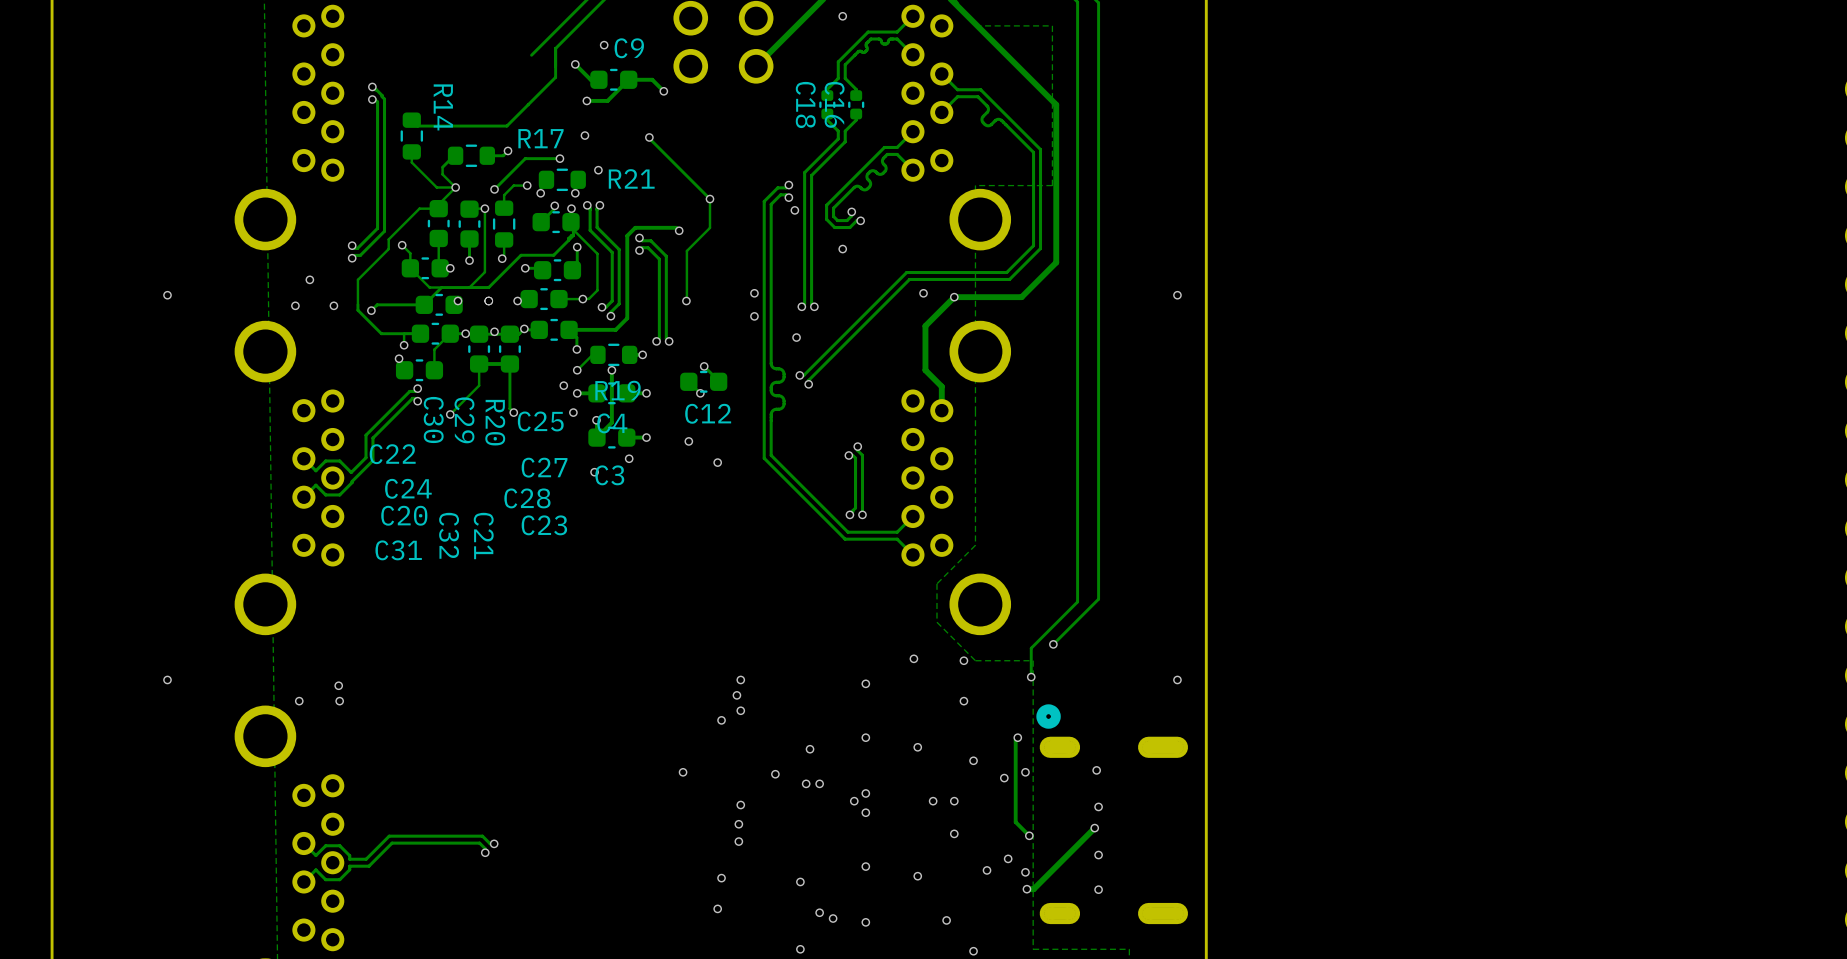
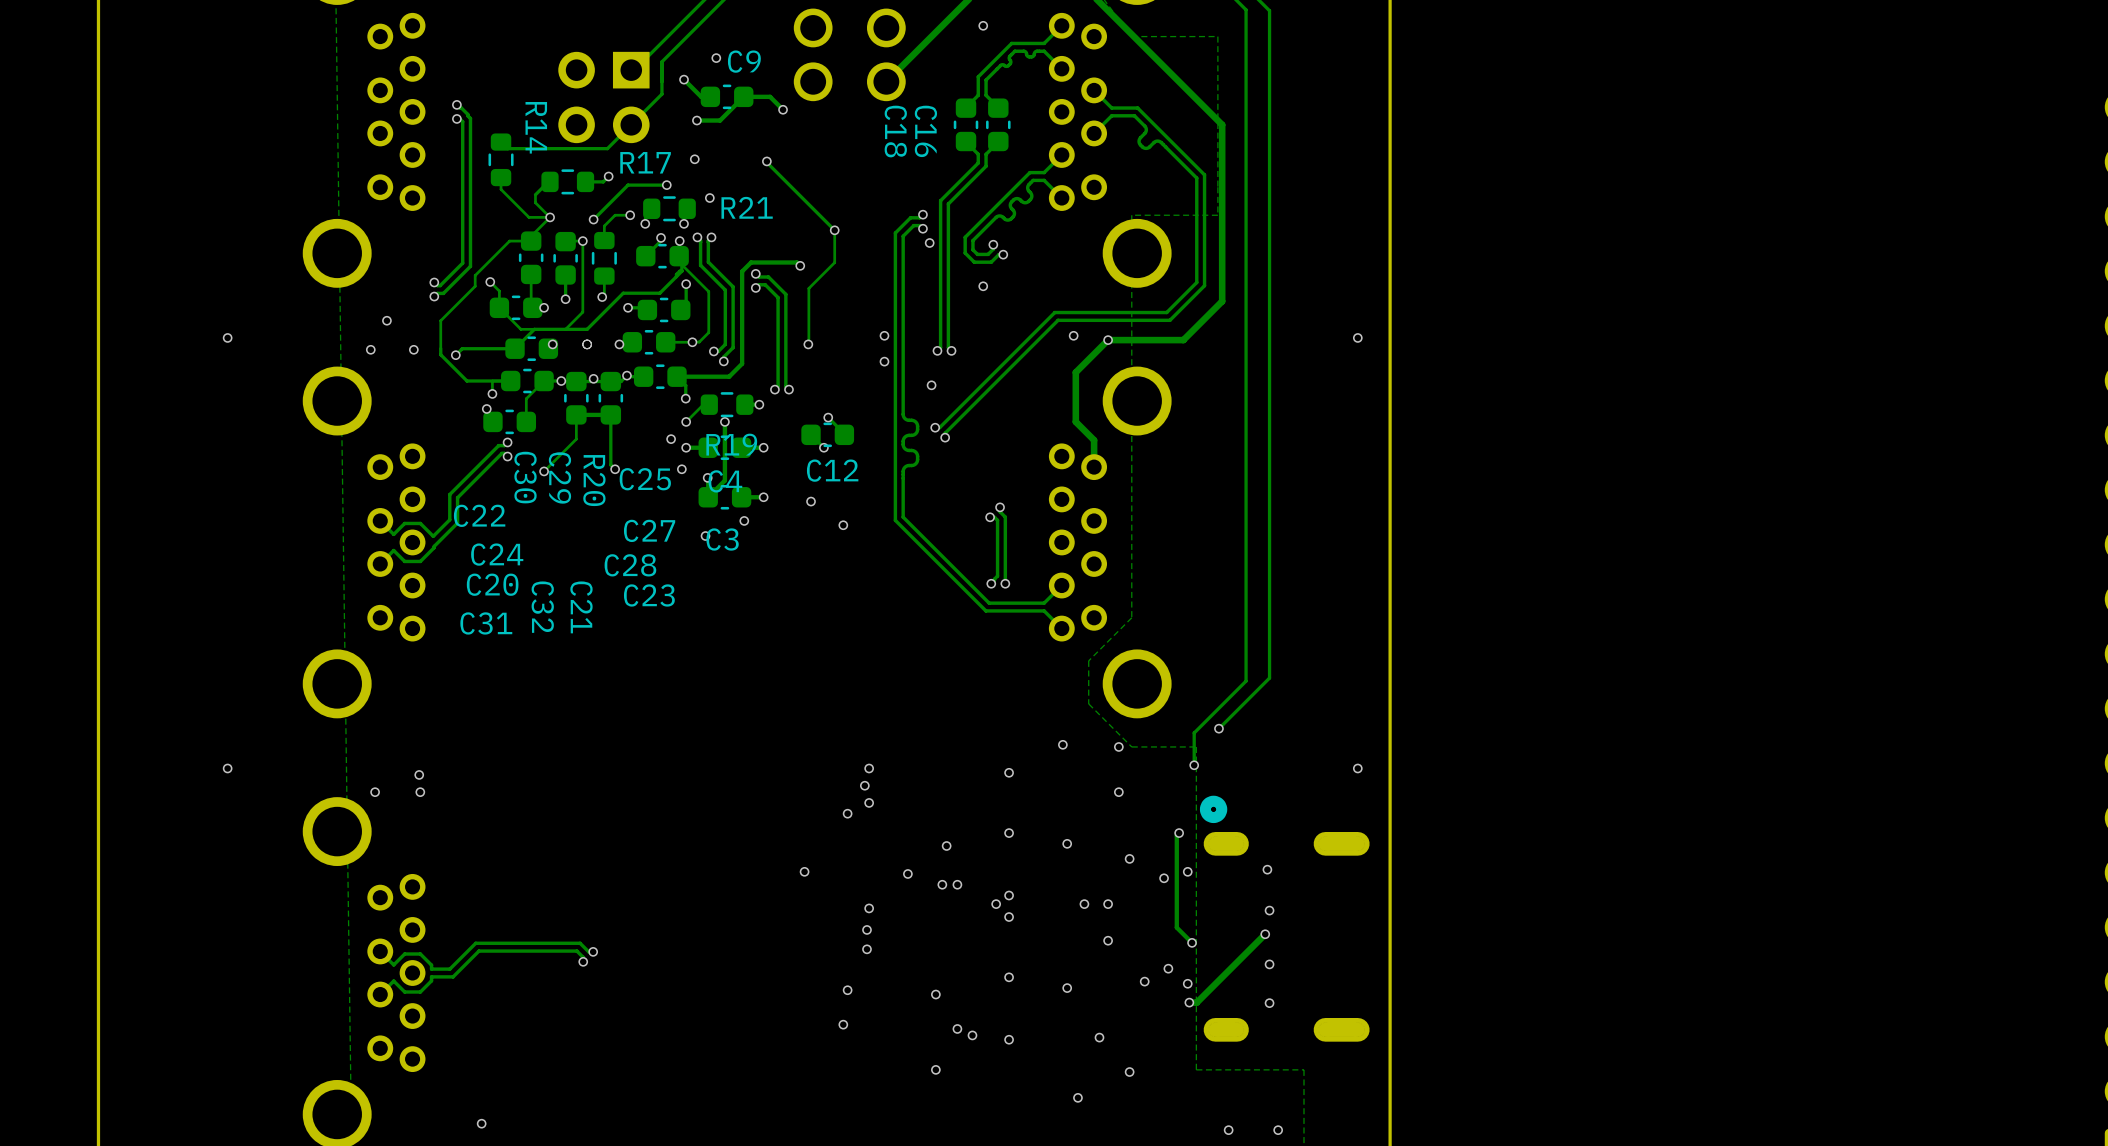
part: none -> (603, 97)
C18 footprint: [819, 90, 836, 120] -> [953, 98, 979, 152]
C16 footprint: [848, 90, 865, 120] -> [986, 98, 1011, 152]
C18 name position: C18 (805, 104) -> C18 (895, 131)
C16 name position: C16 (834, 104) -> C16 (925, 131)

